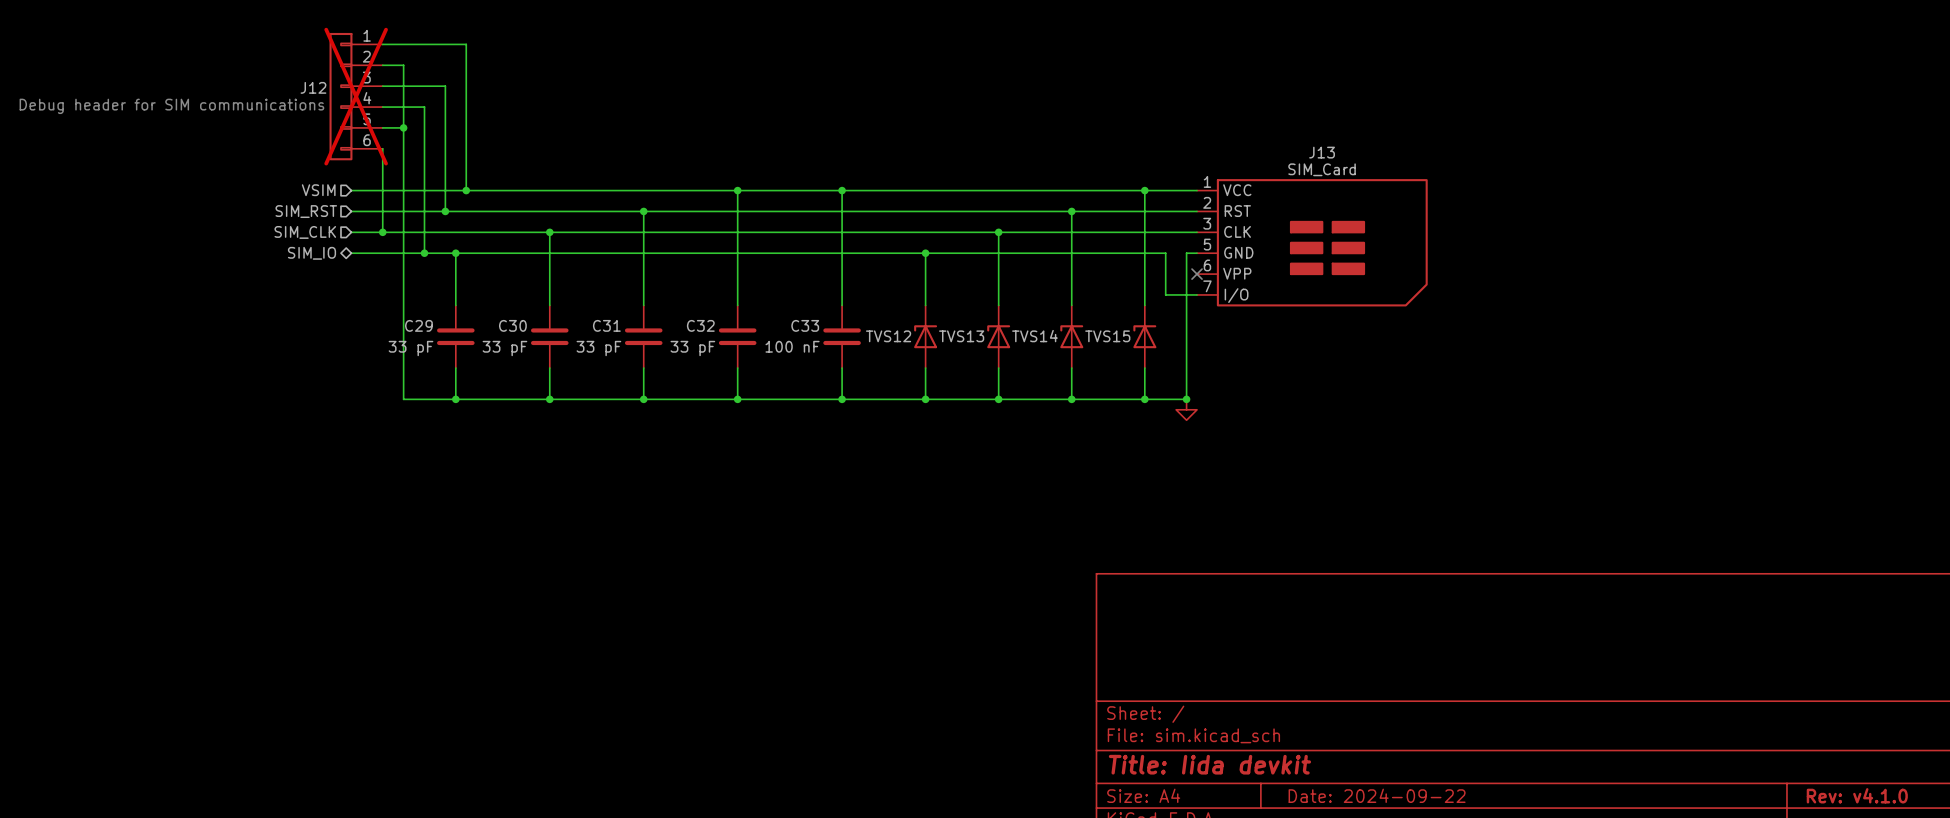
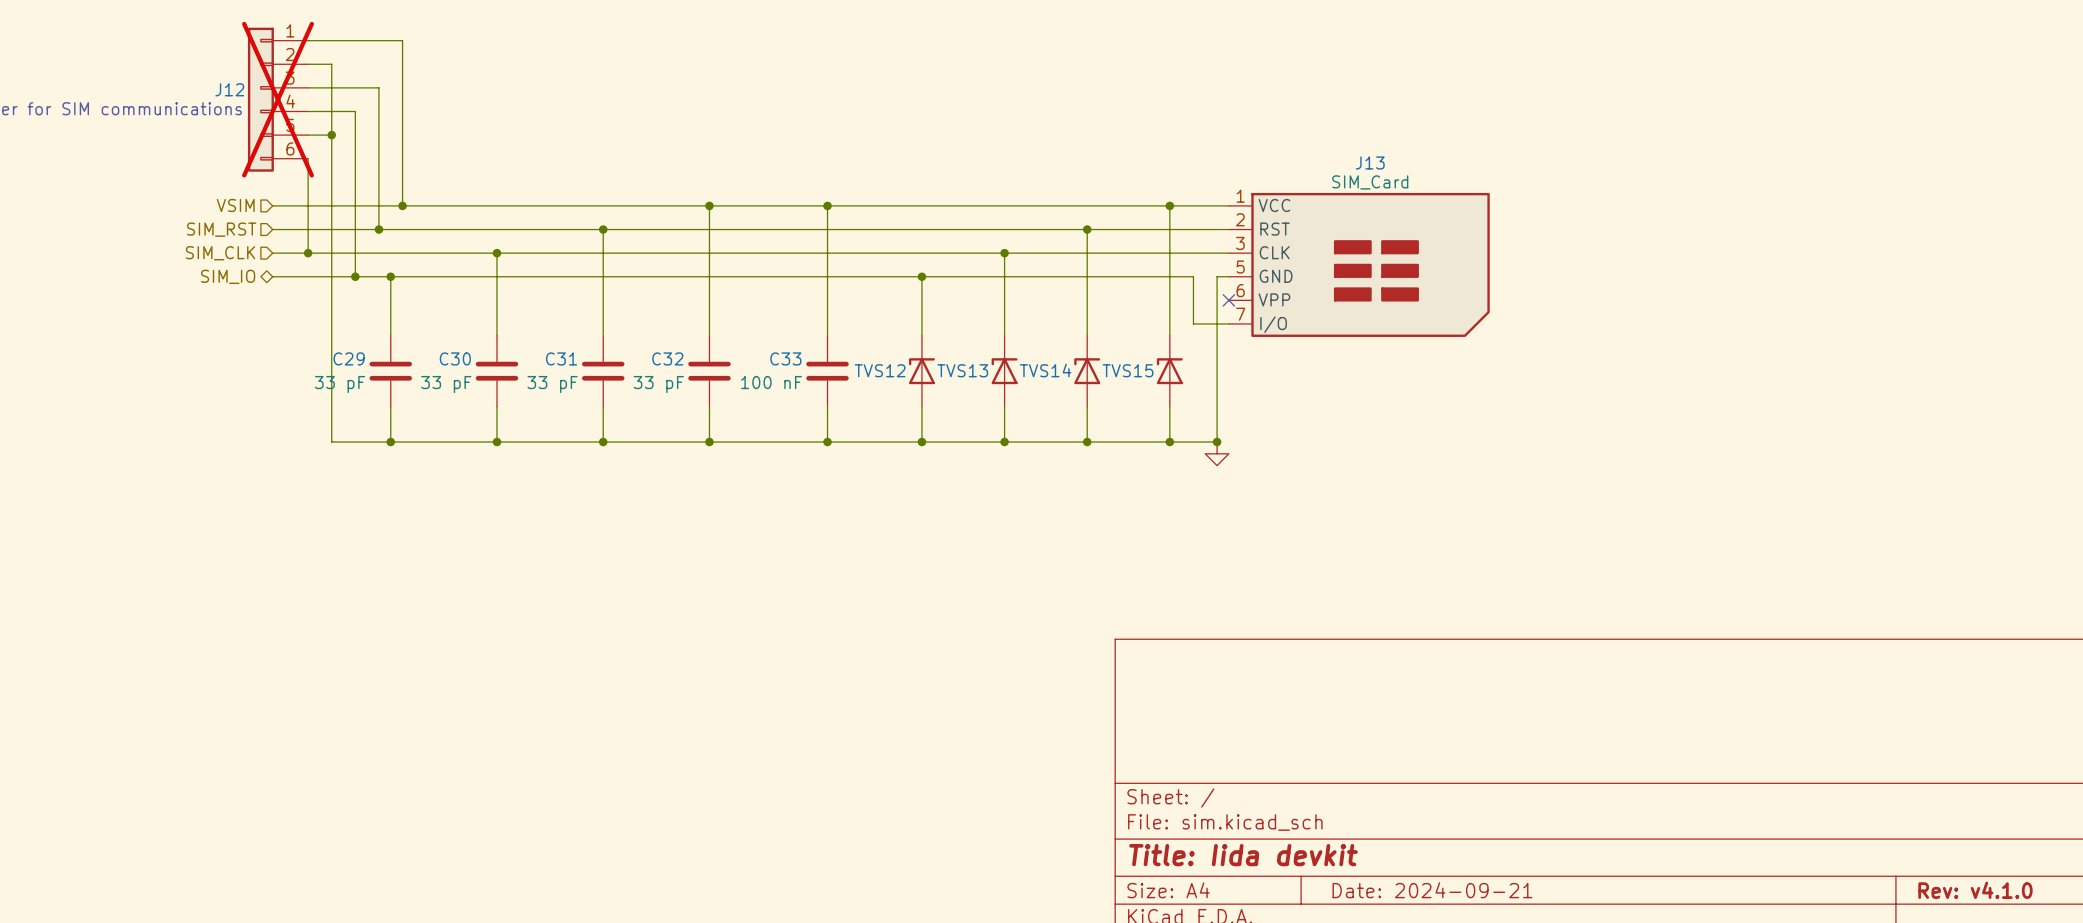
title block: Date: 2024-09-22 (1377, 795) -> Date: 2024-09-21 (1432, 890)

